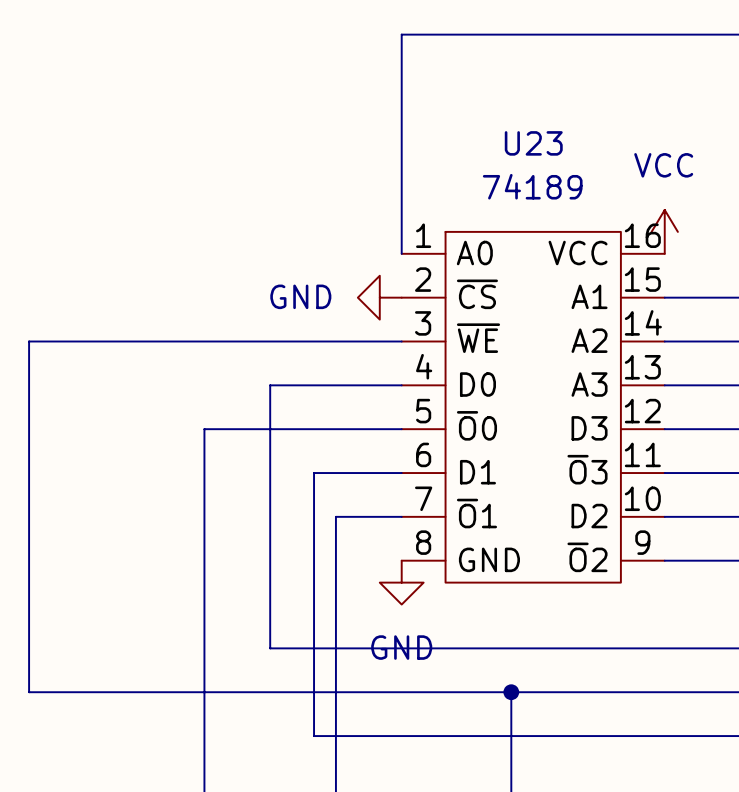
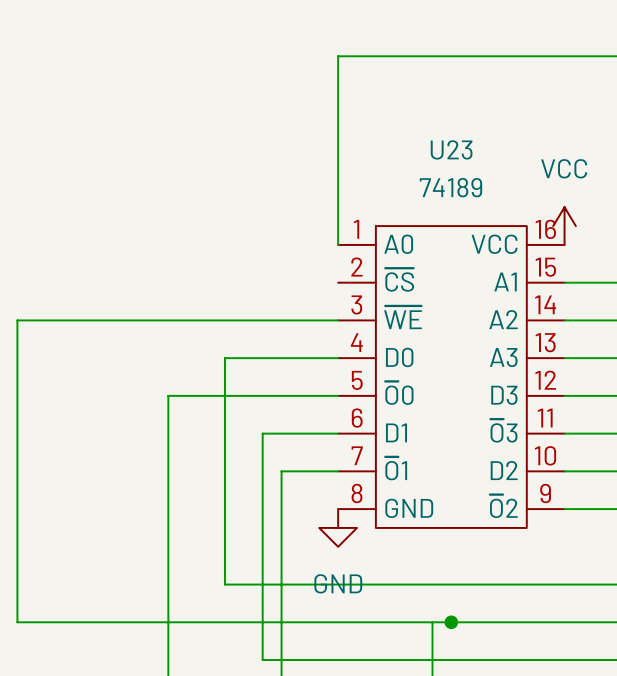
power symbol: GND (379, 297) -> none
junction position: (511, 692) -> (451, 622)

